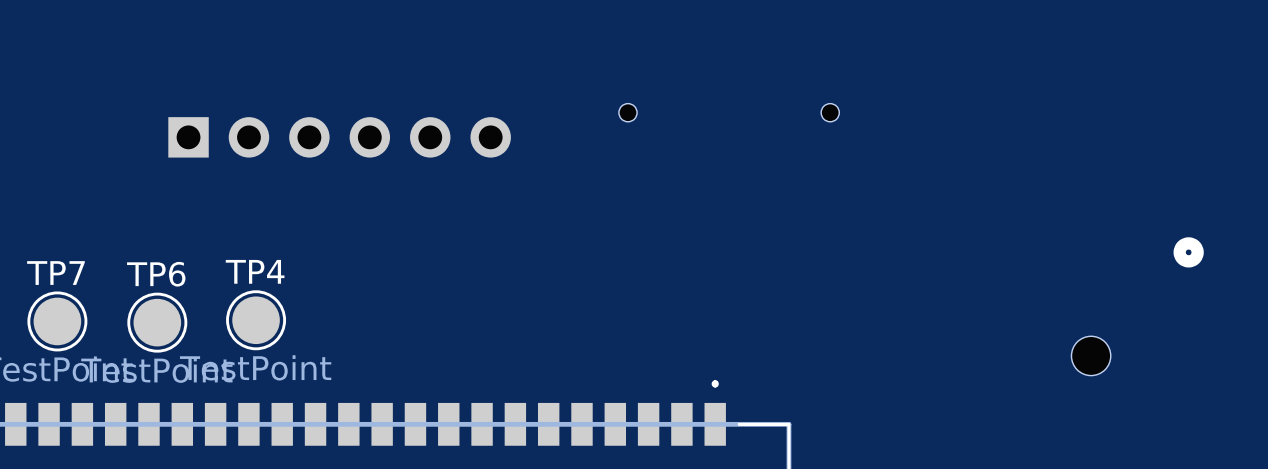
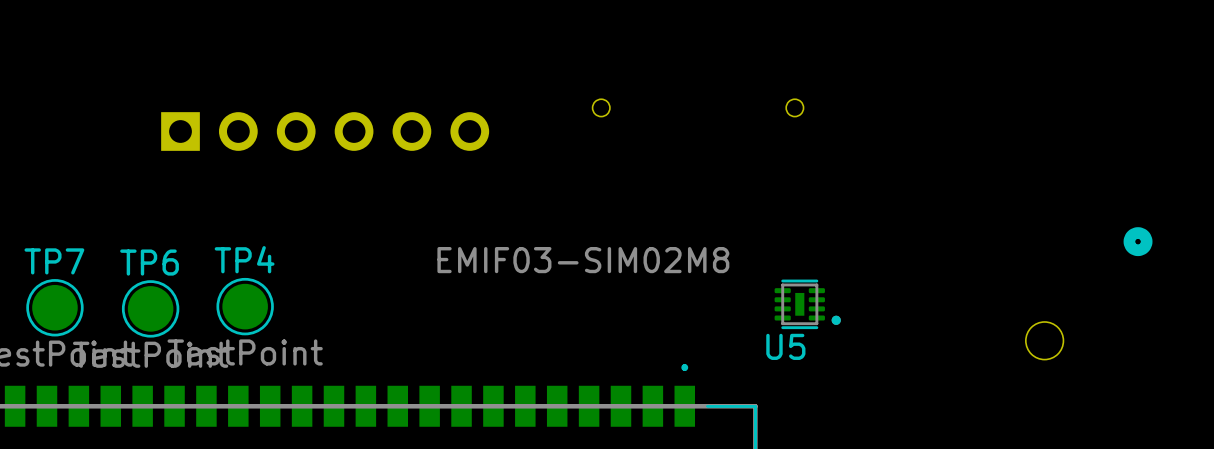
U5: none -> EMIF03-SIM02M8 (807, 304)

